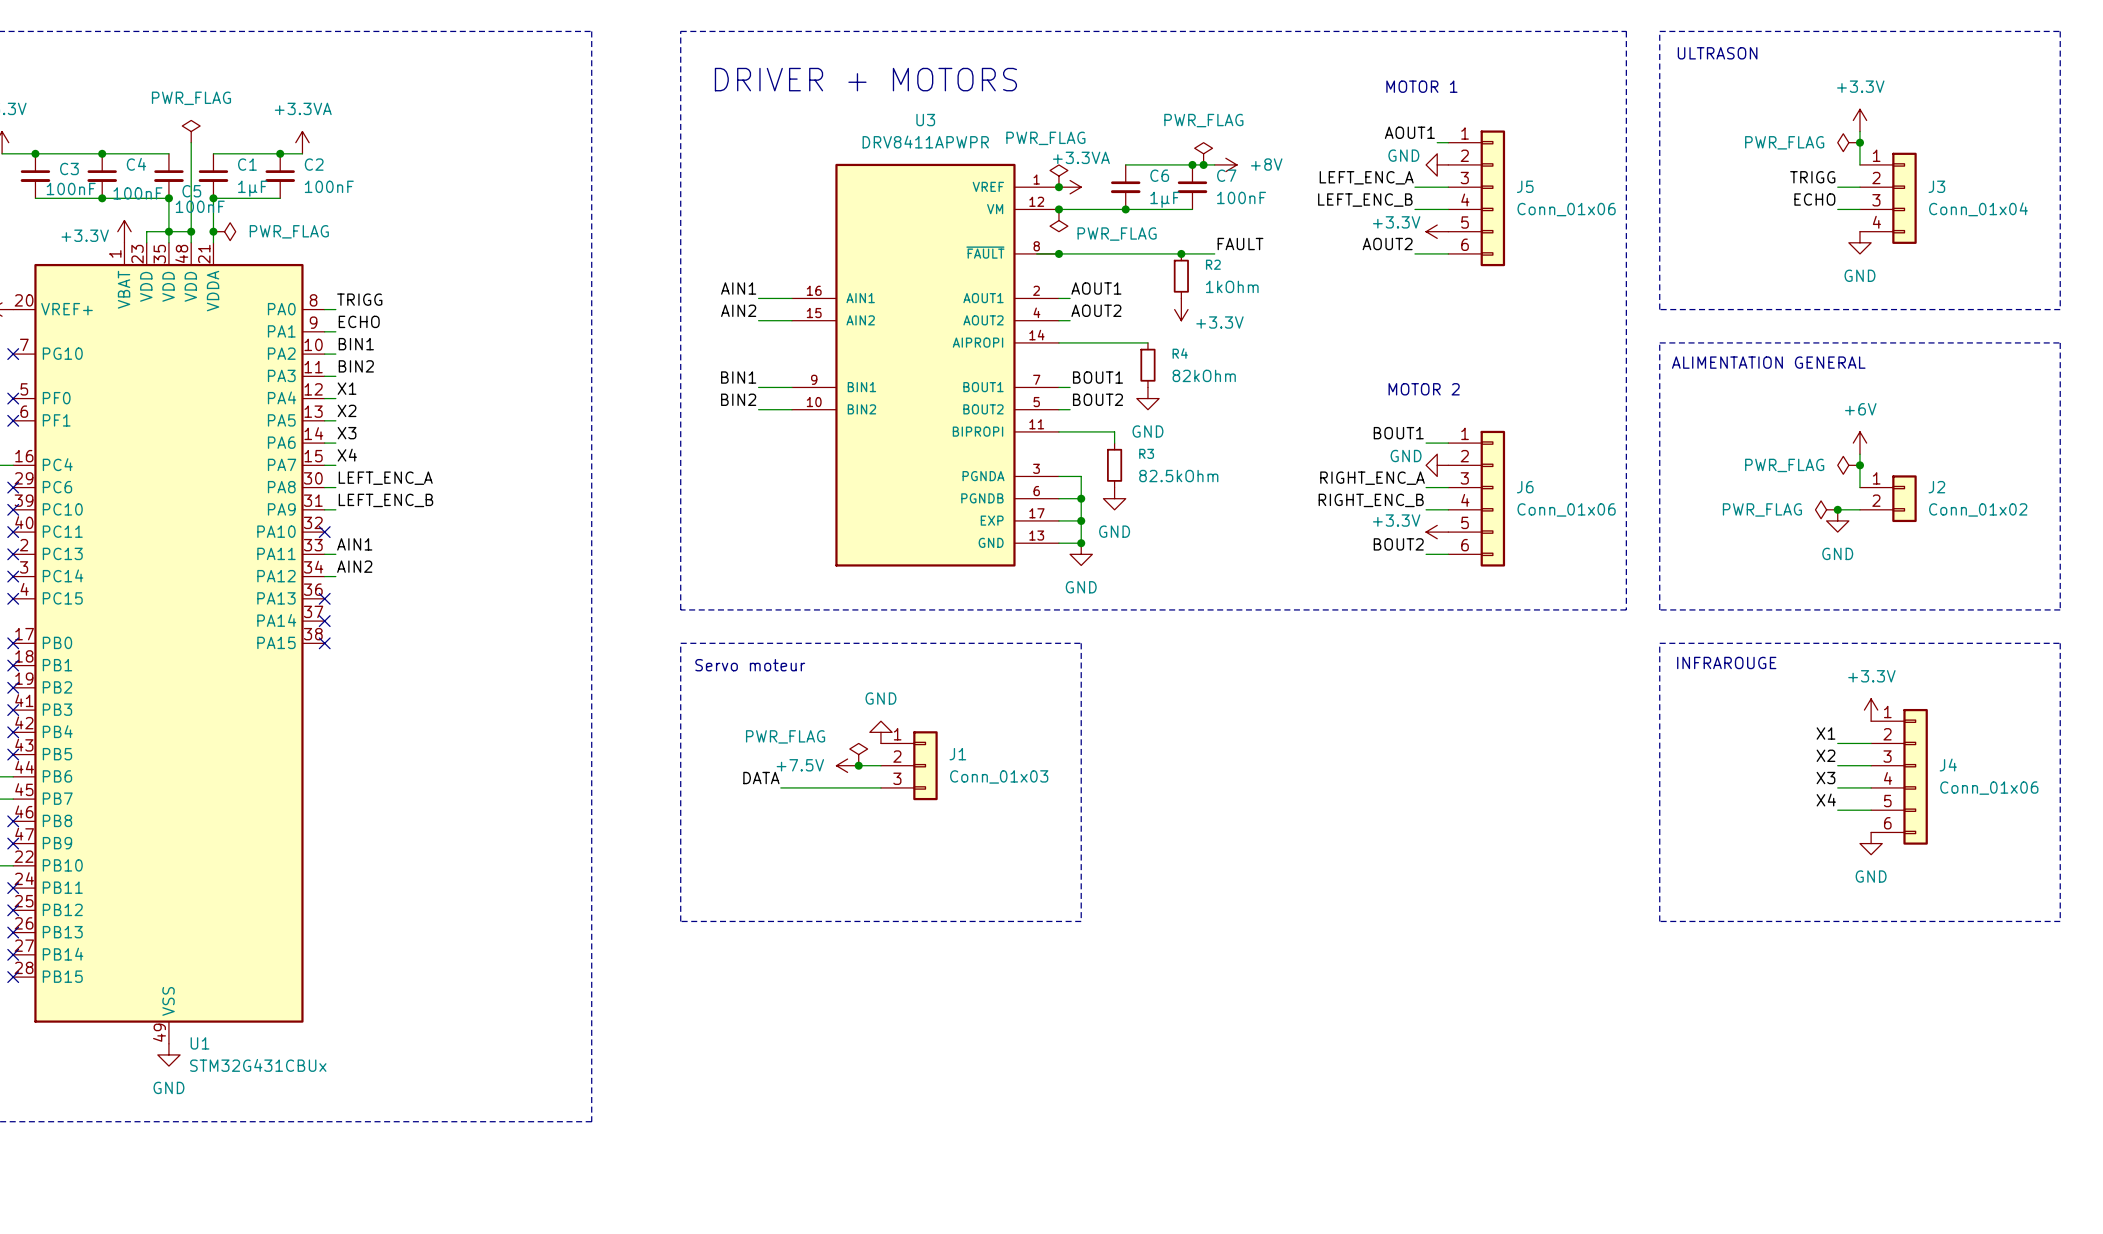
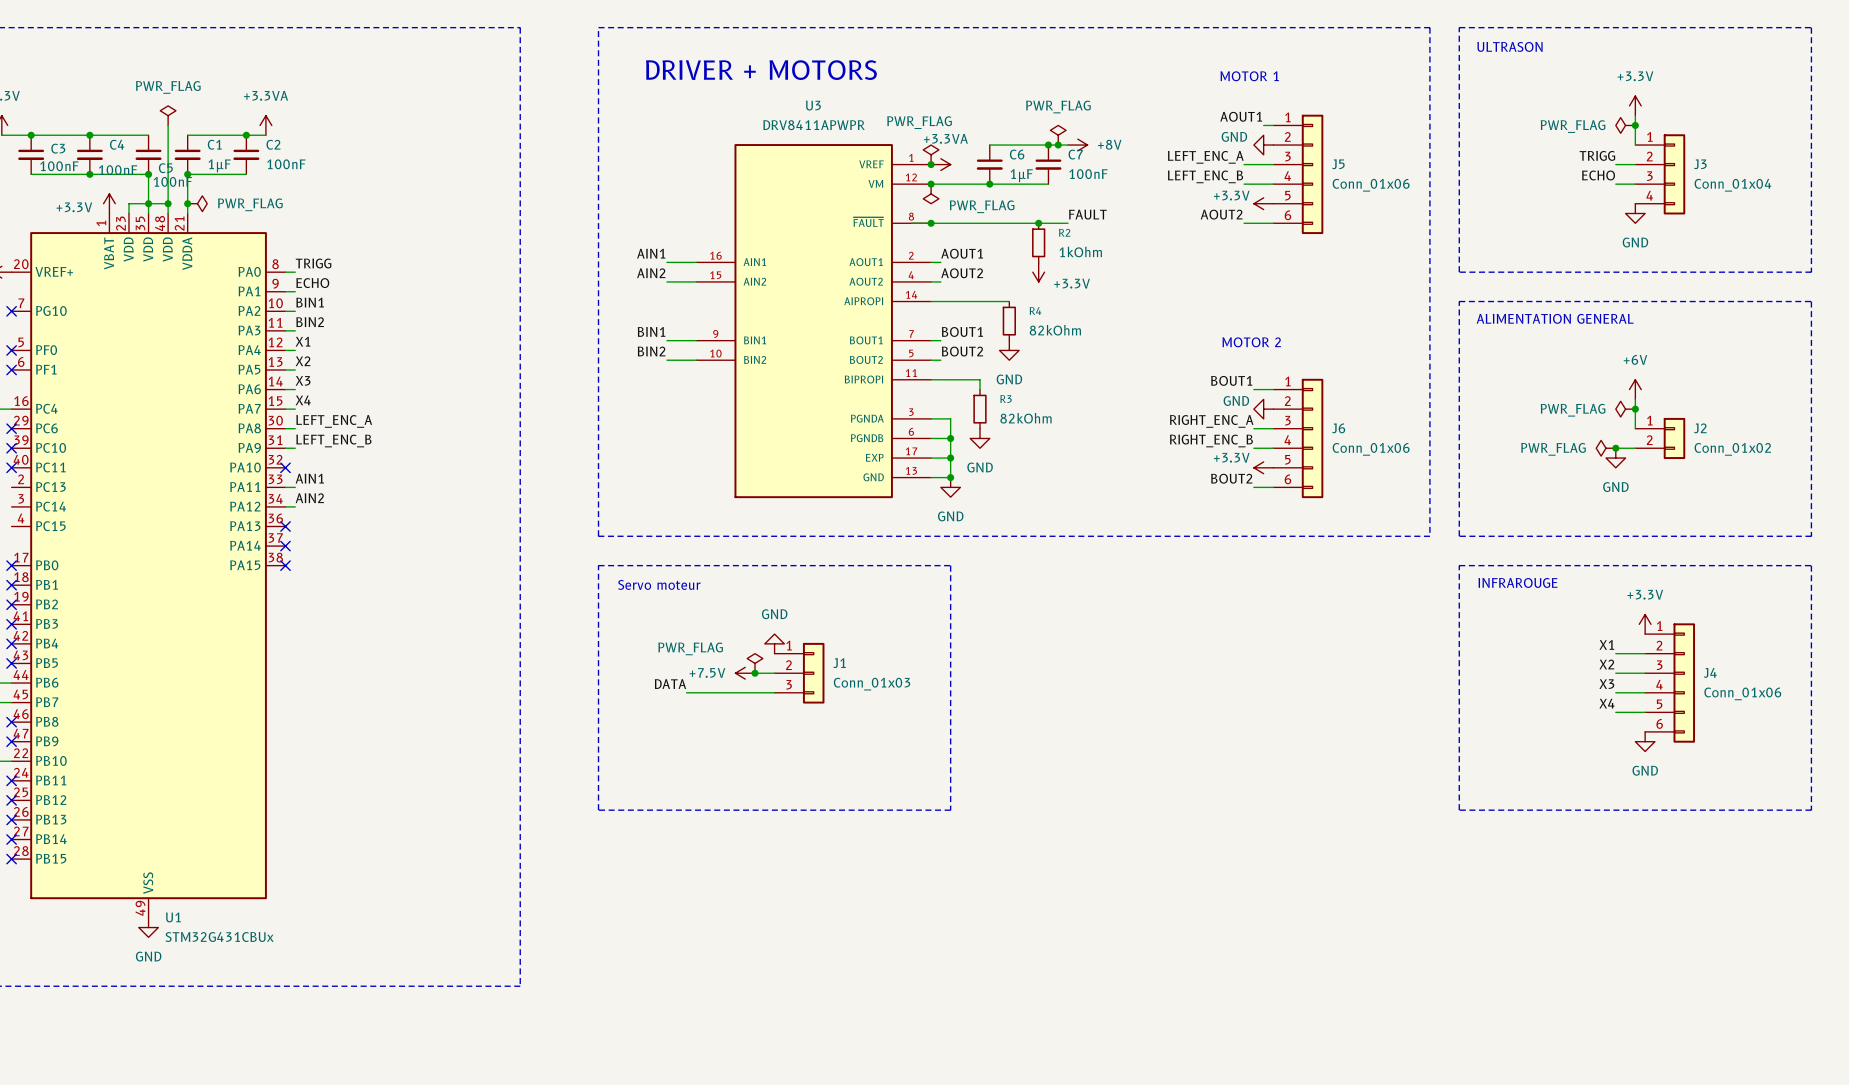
R3 value: 82.5kOhm (1178, 476) -> 82kOhm (1025, 418)
no-connect mark: (13, 554) -> none
no-connect mark: (13, 576) -> none
no-connect mark: (13, 598) -> none

